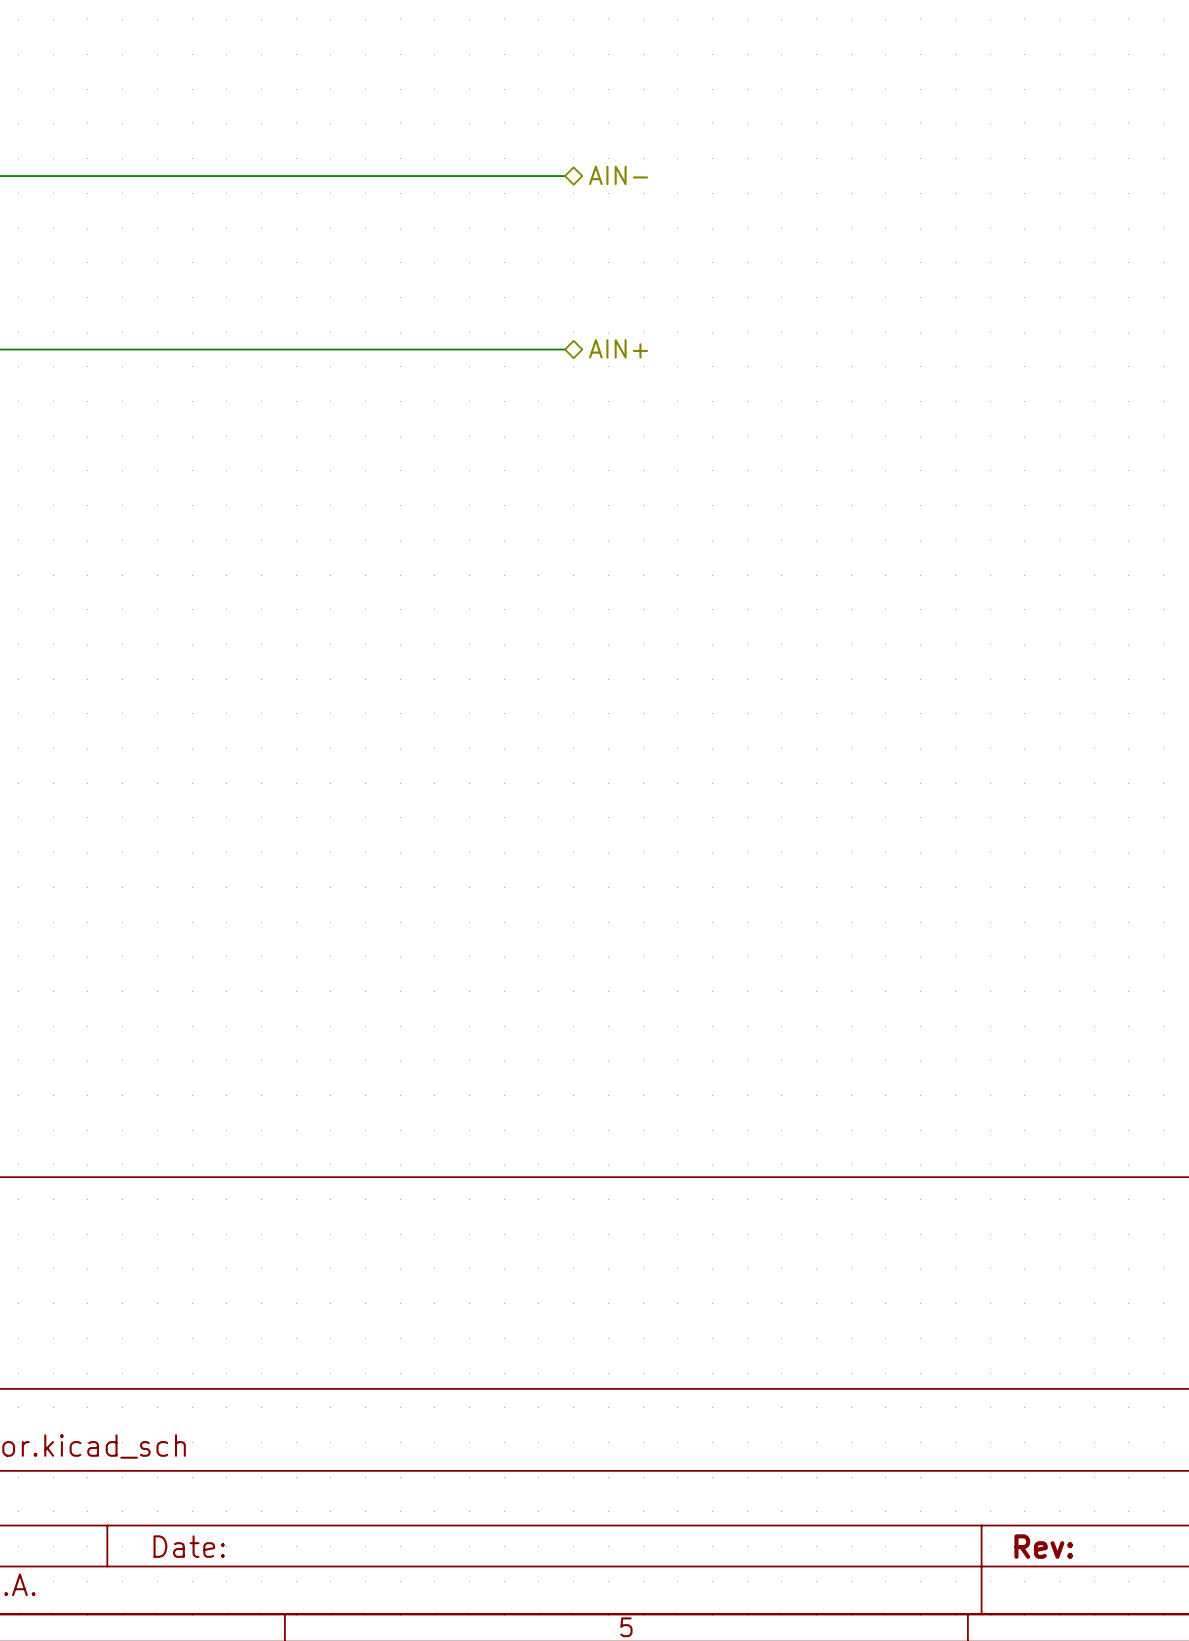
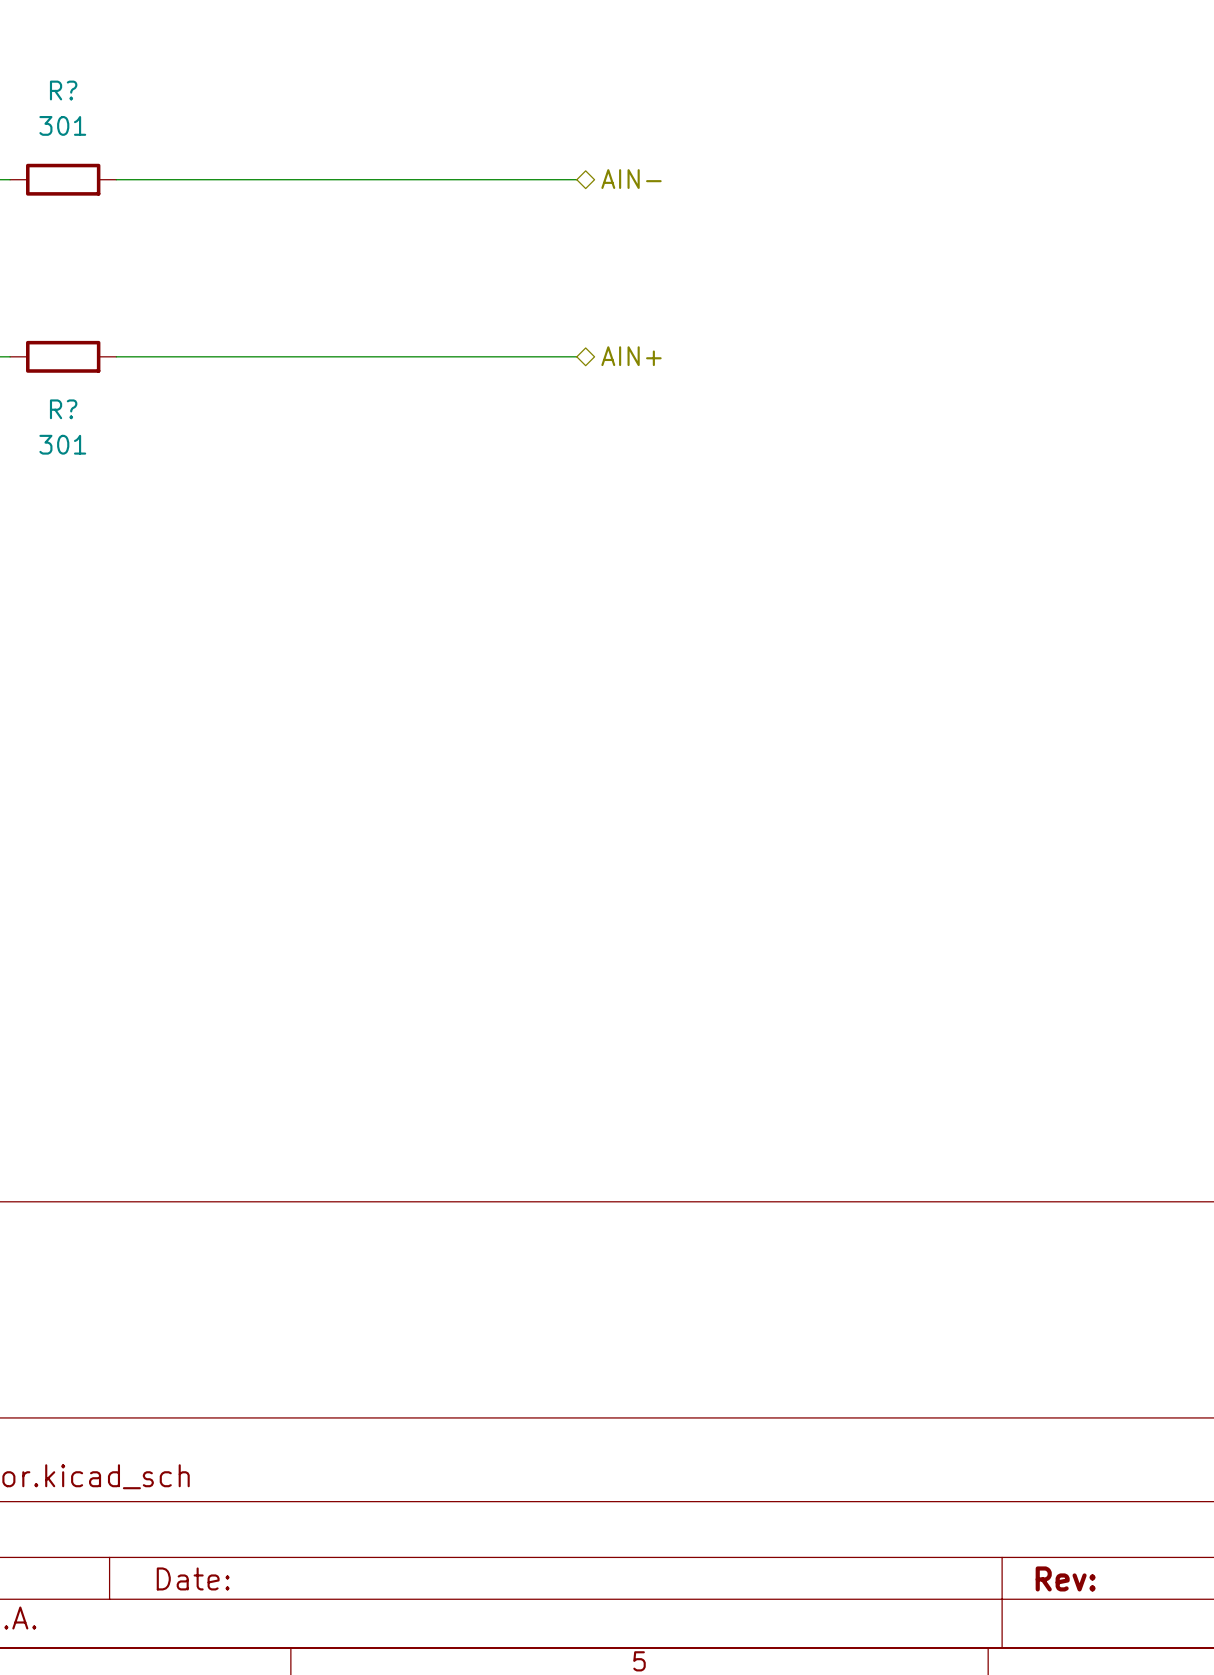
wire: (9, 176) (113, 176) -> none
R?: none -> 301 (63, 179)
wire: (9, 349) (113, 349) -> none
R?: none -> 301 (63, 356)

